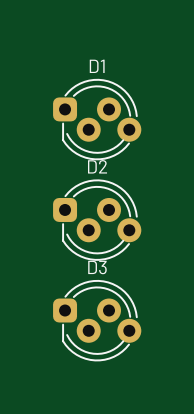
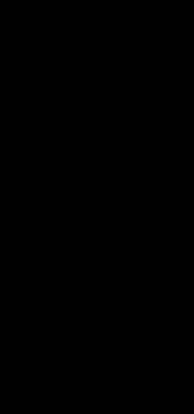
D1: (97, 119) -> none
D2: (97, 220) -> none
D3: (97, 320) -> none

